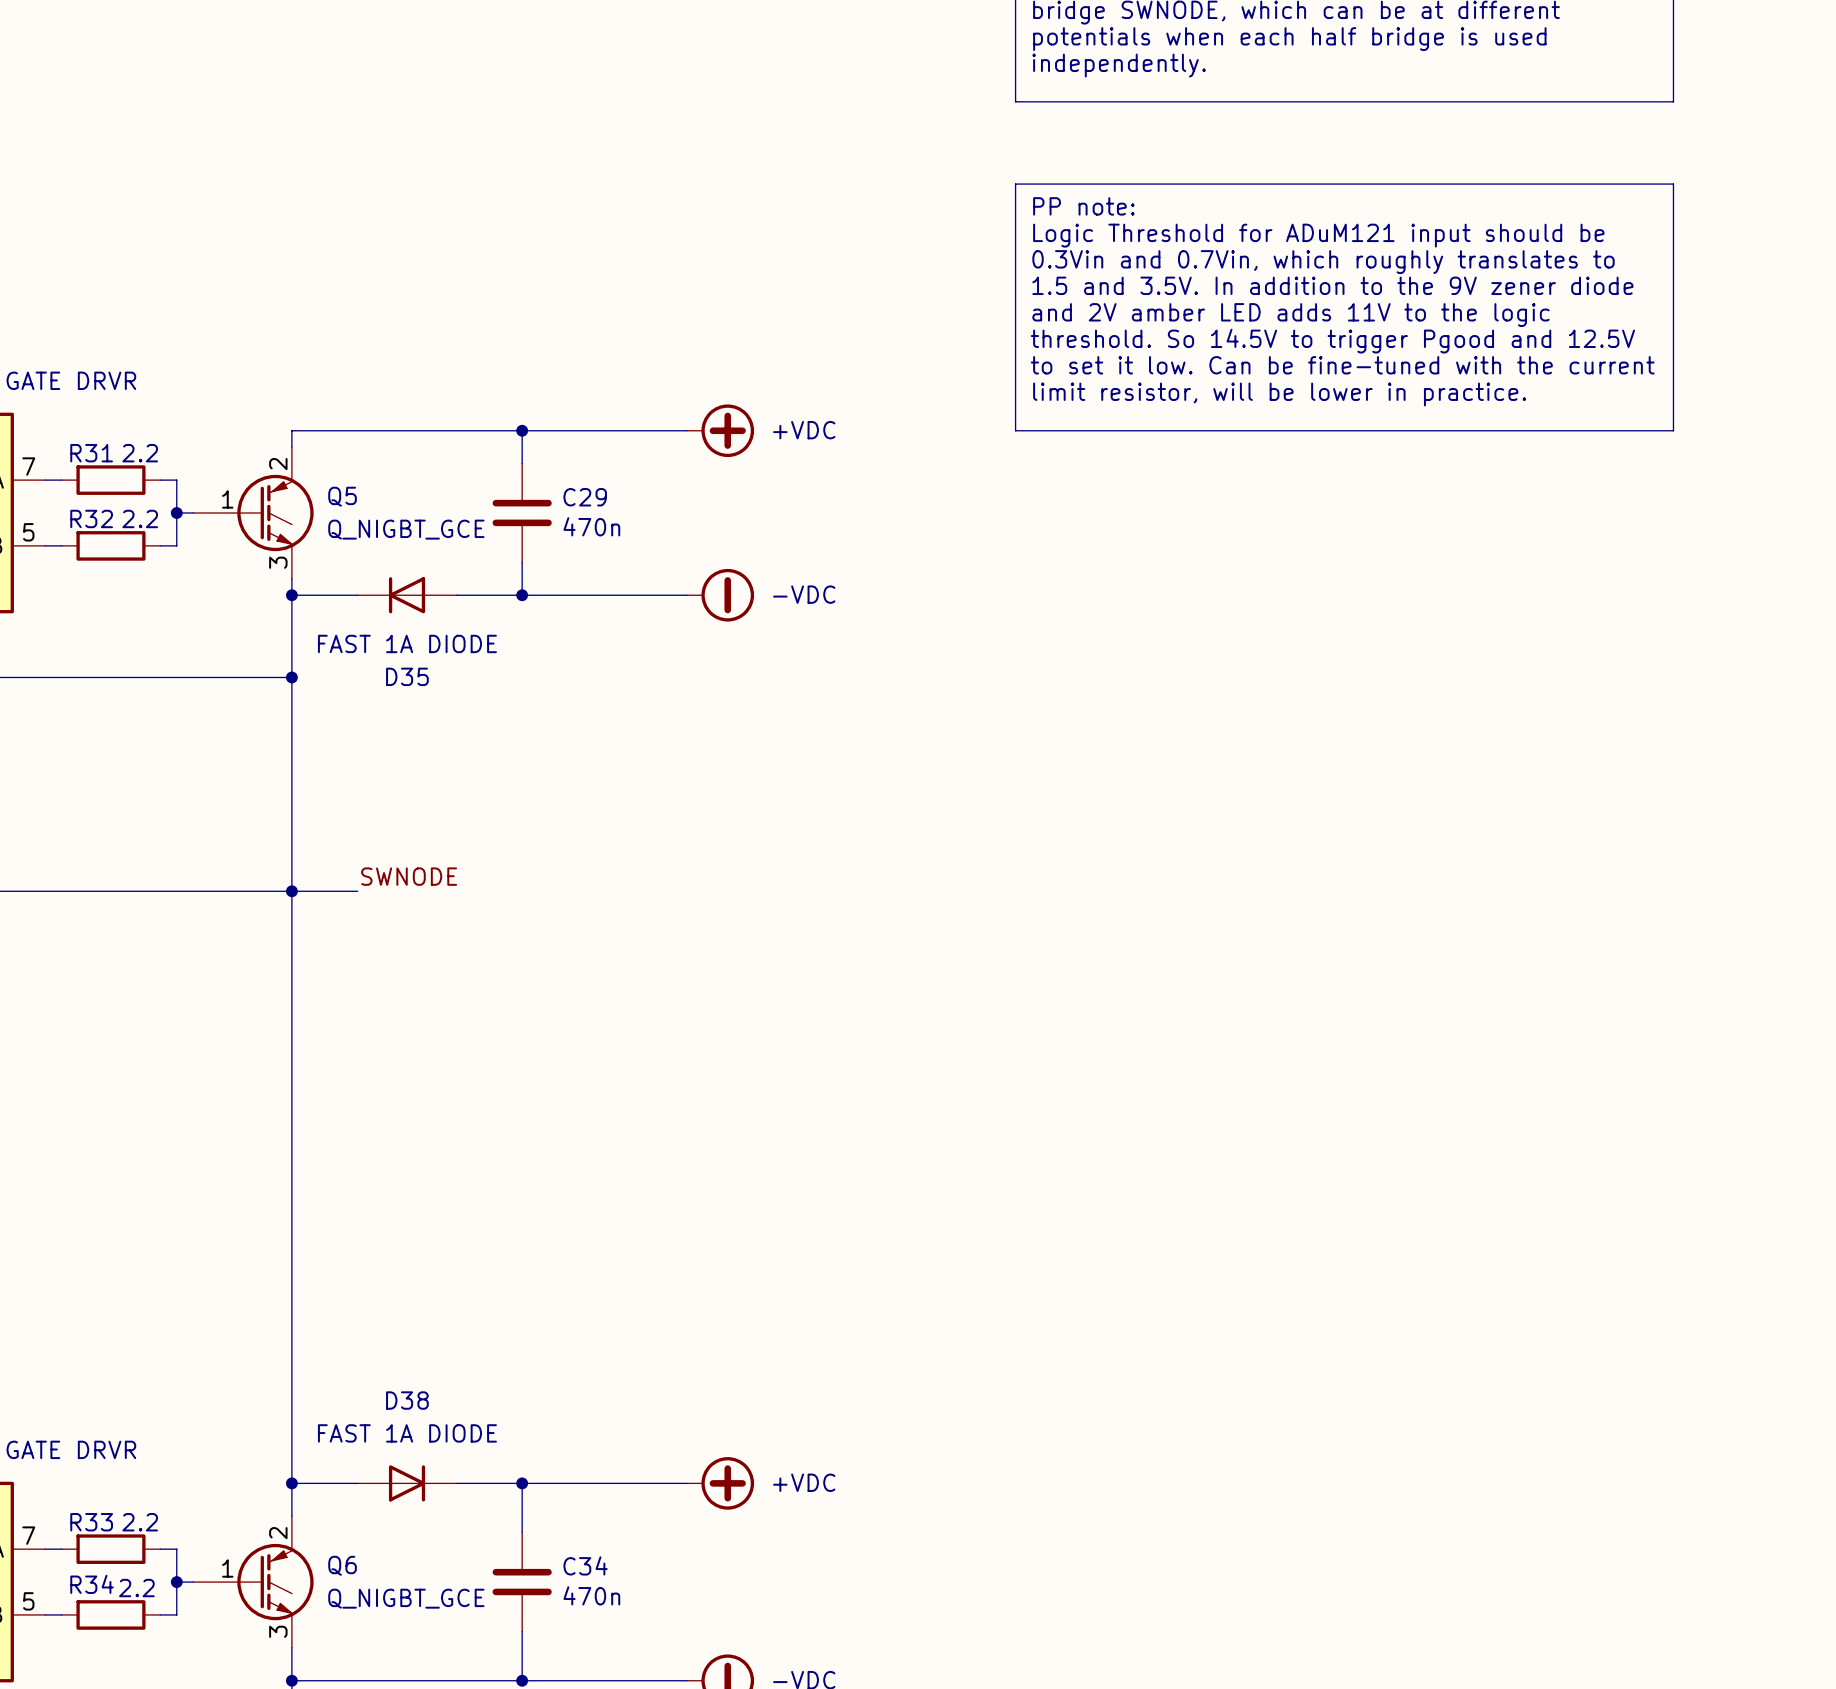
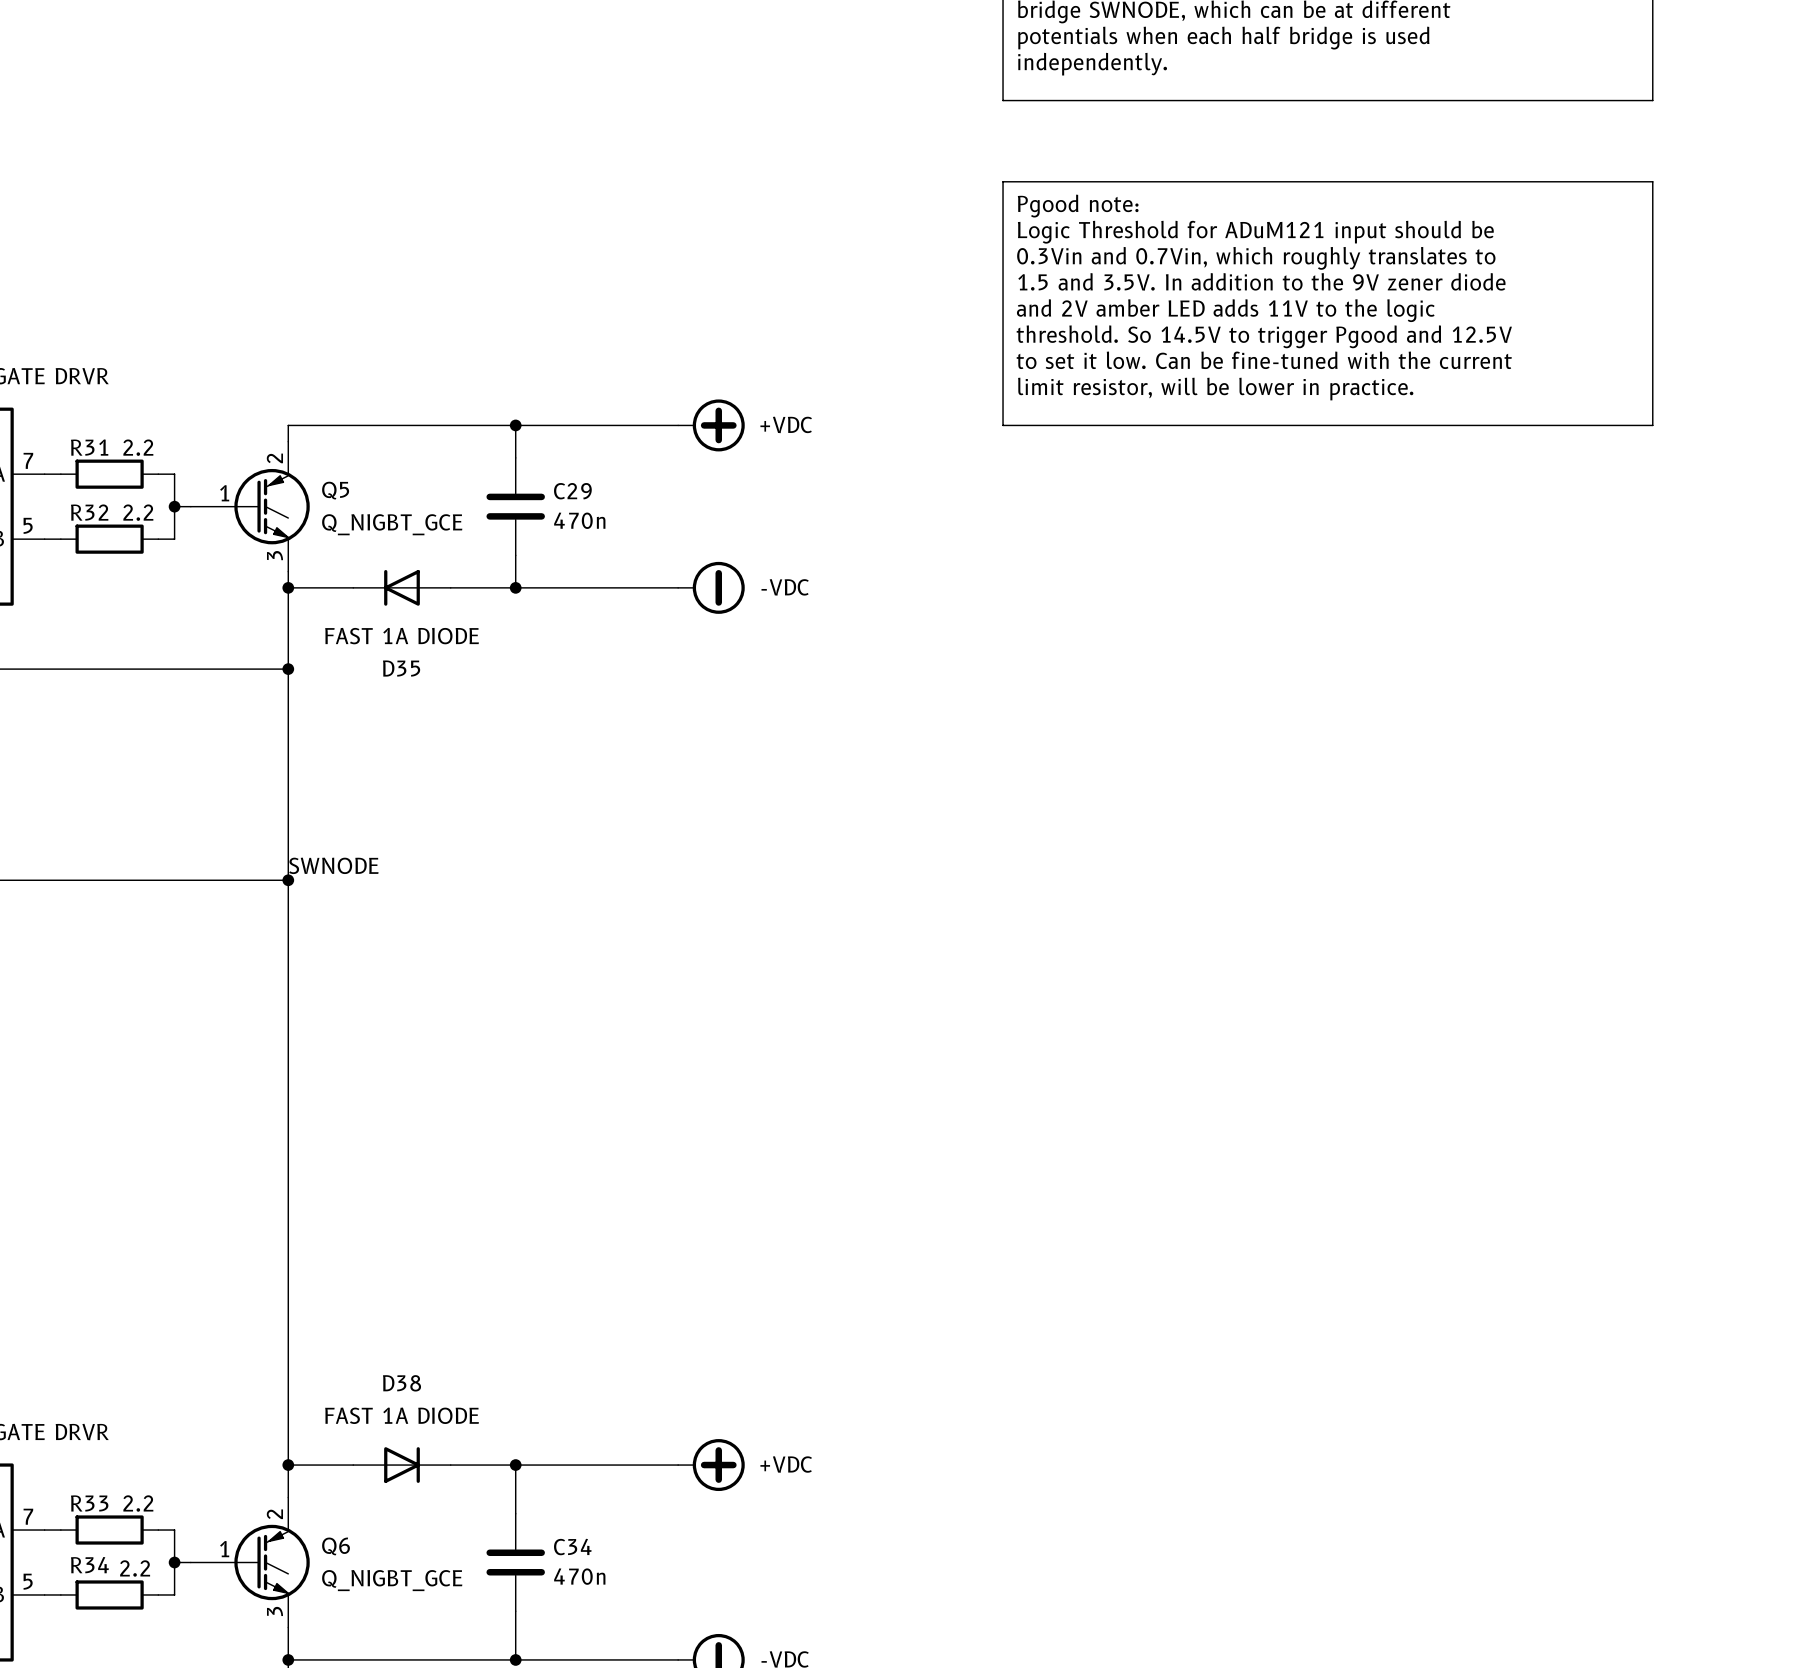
text: PP note: (1083, 206) -> Pgood note: (1078, 206)
label position: SWNODE (409, 876) -> SWNODE (333, 865)
wire: (291, 891) (357, 891) -> none

